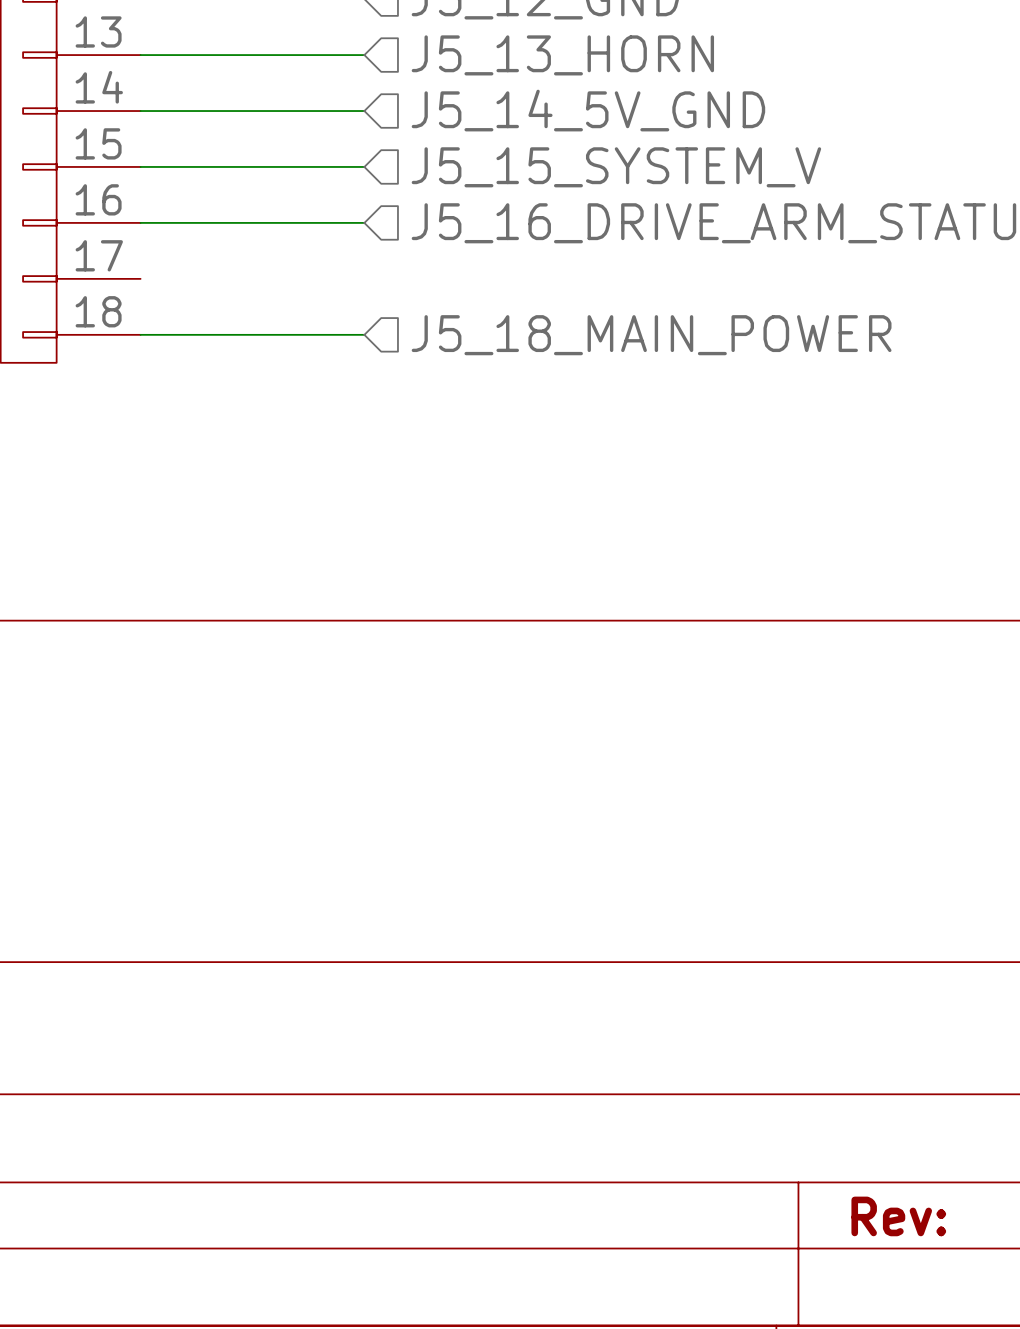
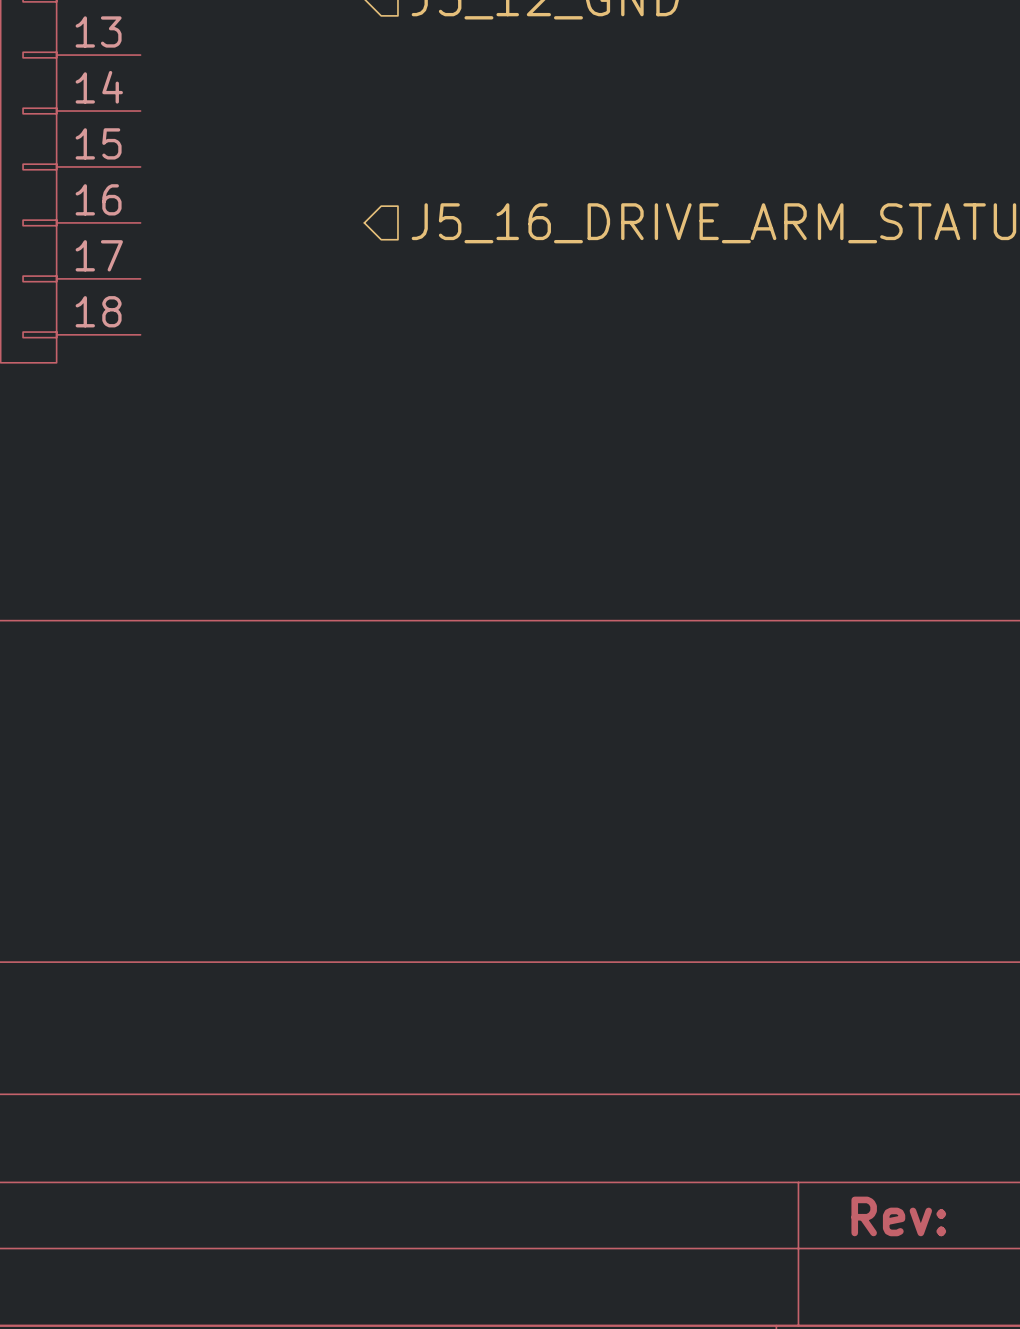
wire: (140, 55) (364, 55) -> none
hierarchical label: J5_13_HORN (562, 55) -> none
hierarchical label: J5_14_5V_GND (588, 110) -> none
wire: (140, 111) (364, 111) -> none
wire: (140, 166) (364, 166) -> none
hierarchical label: J5_15_SYSTEM_V (616, 167) -> none
wire: (140, 222) (364, 222) -> none
wire: (140, 334) (364, 334) -> none
hierarchical label: J5_18_MAIN_POWER (651, 335) -> none

